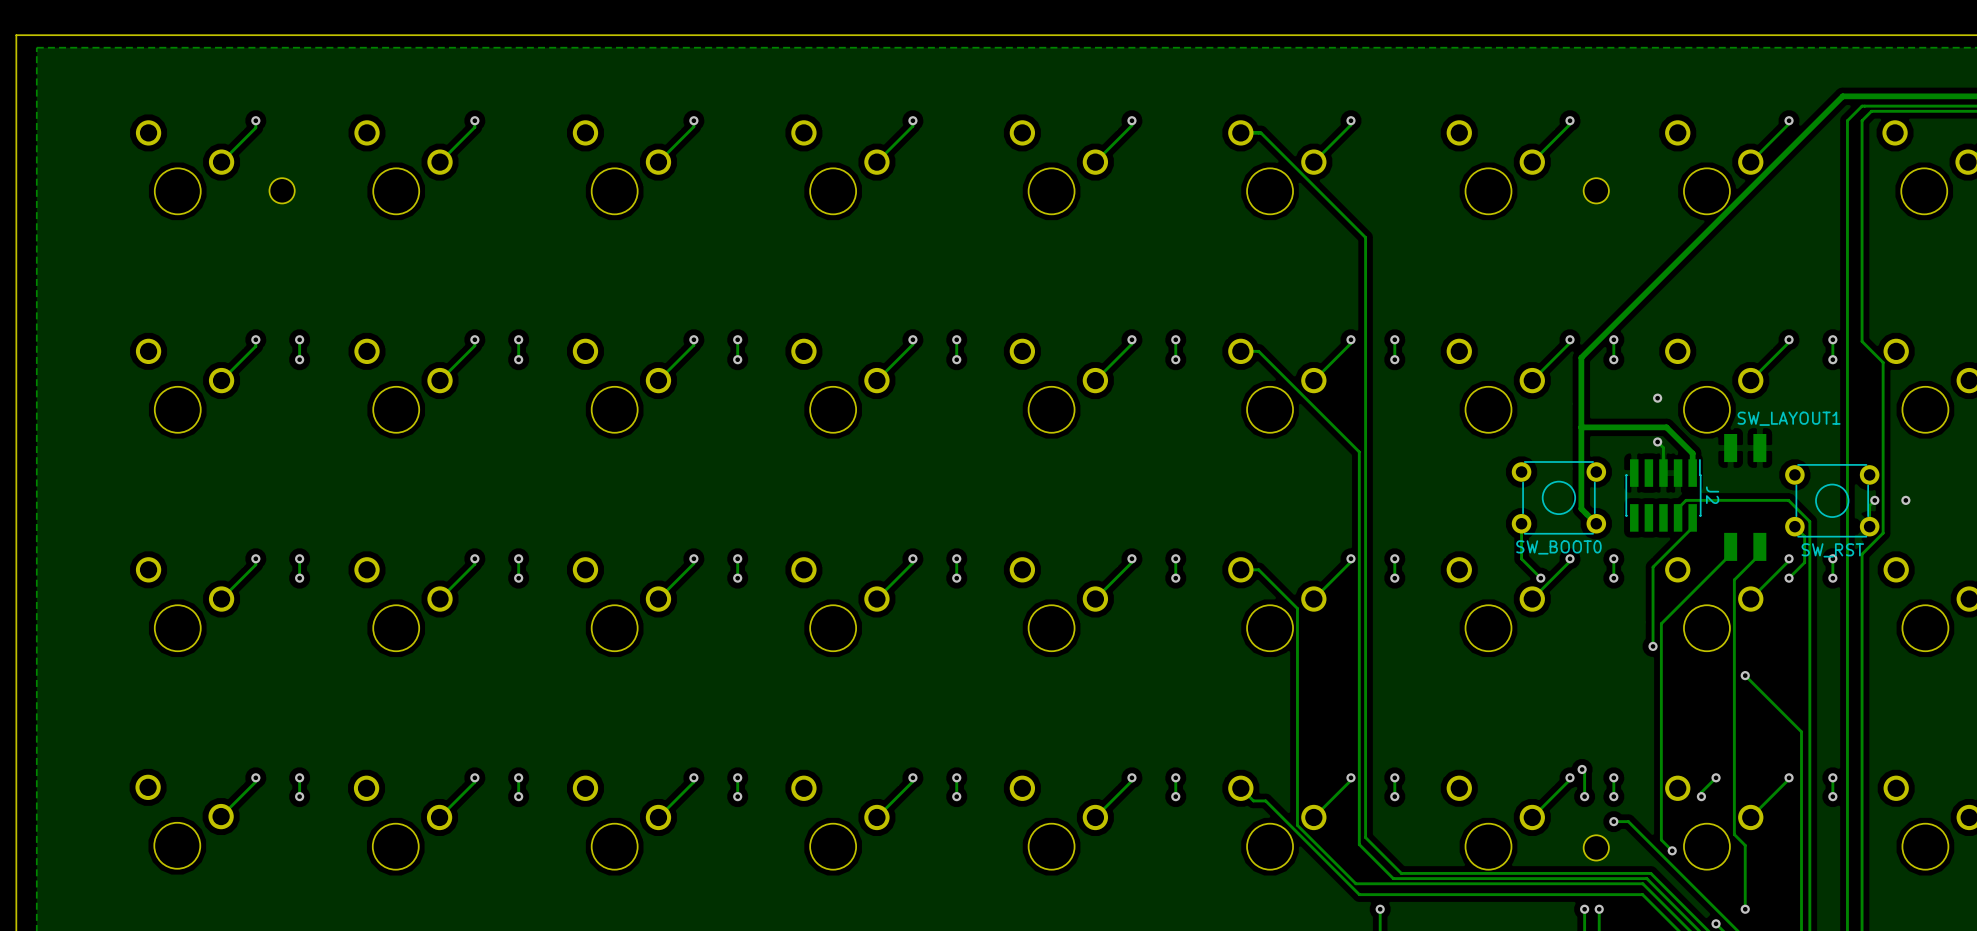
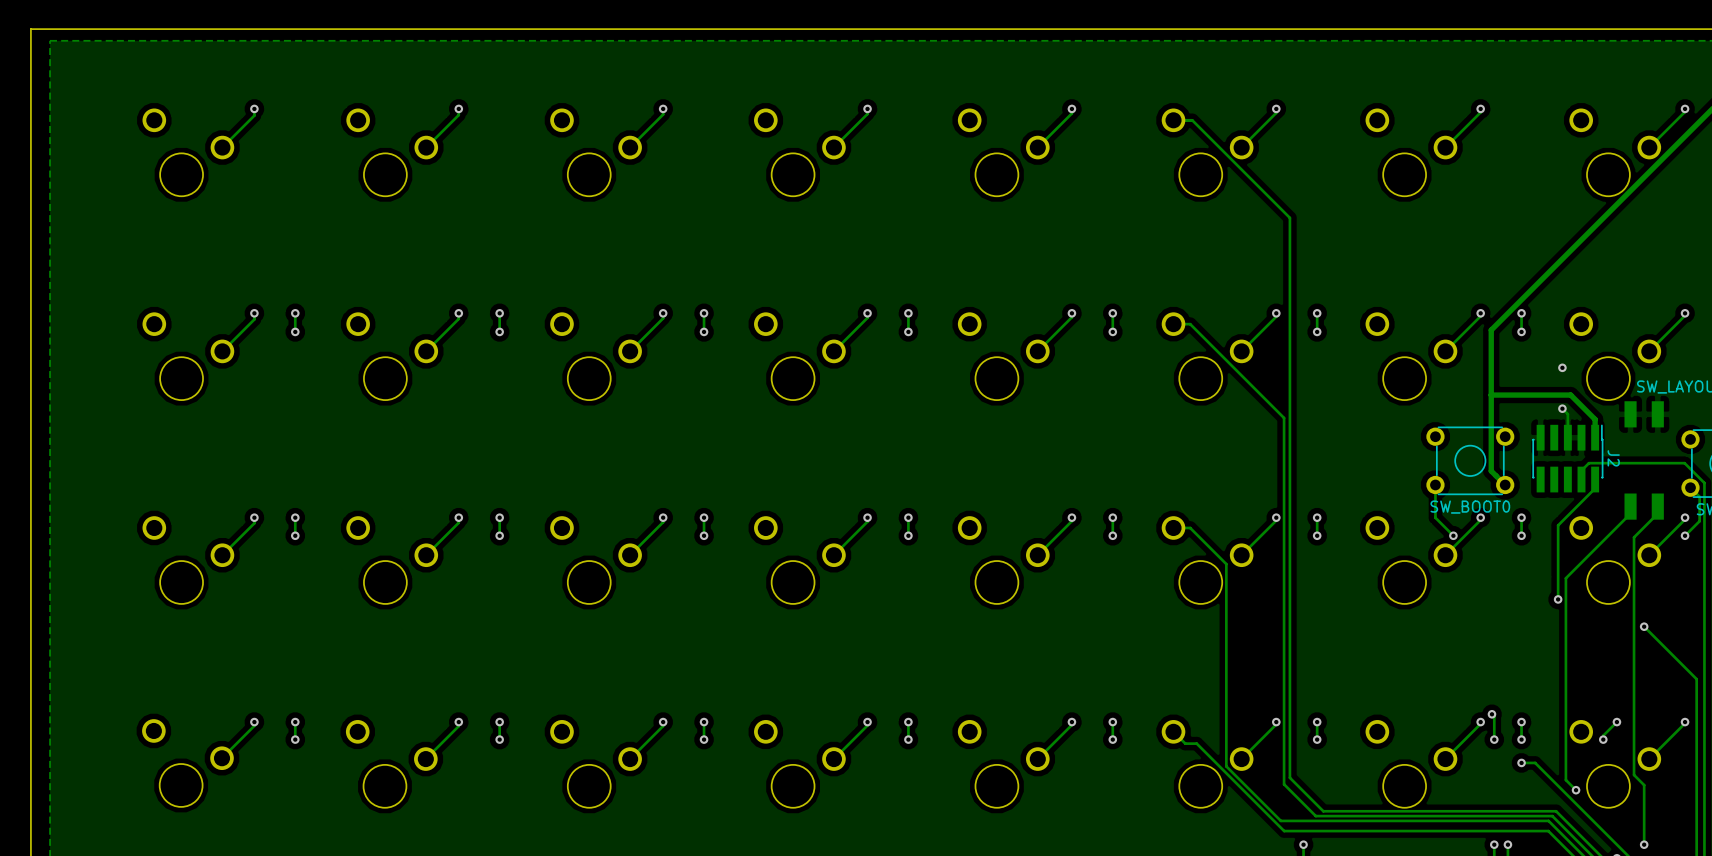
part: (282, 190) -> none
part: (1596, 190) -> none
part: (1596, 847) -> none

